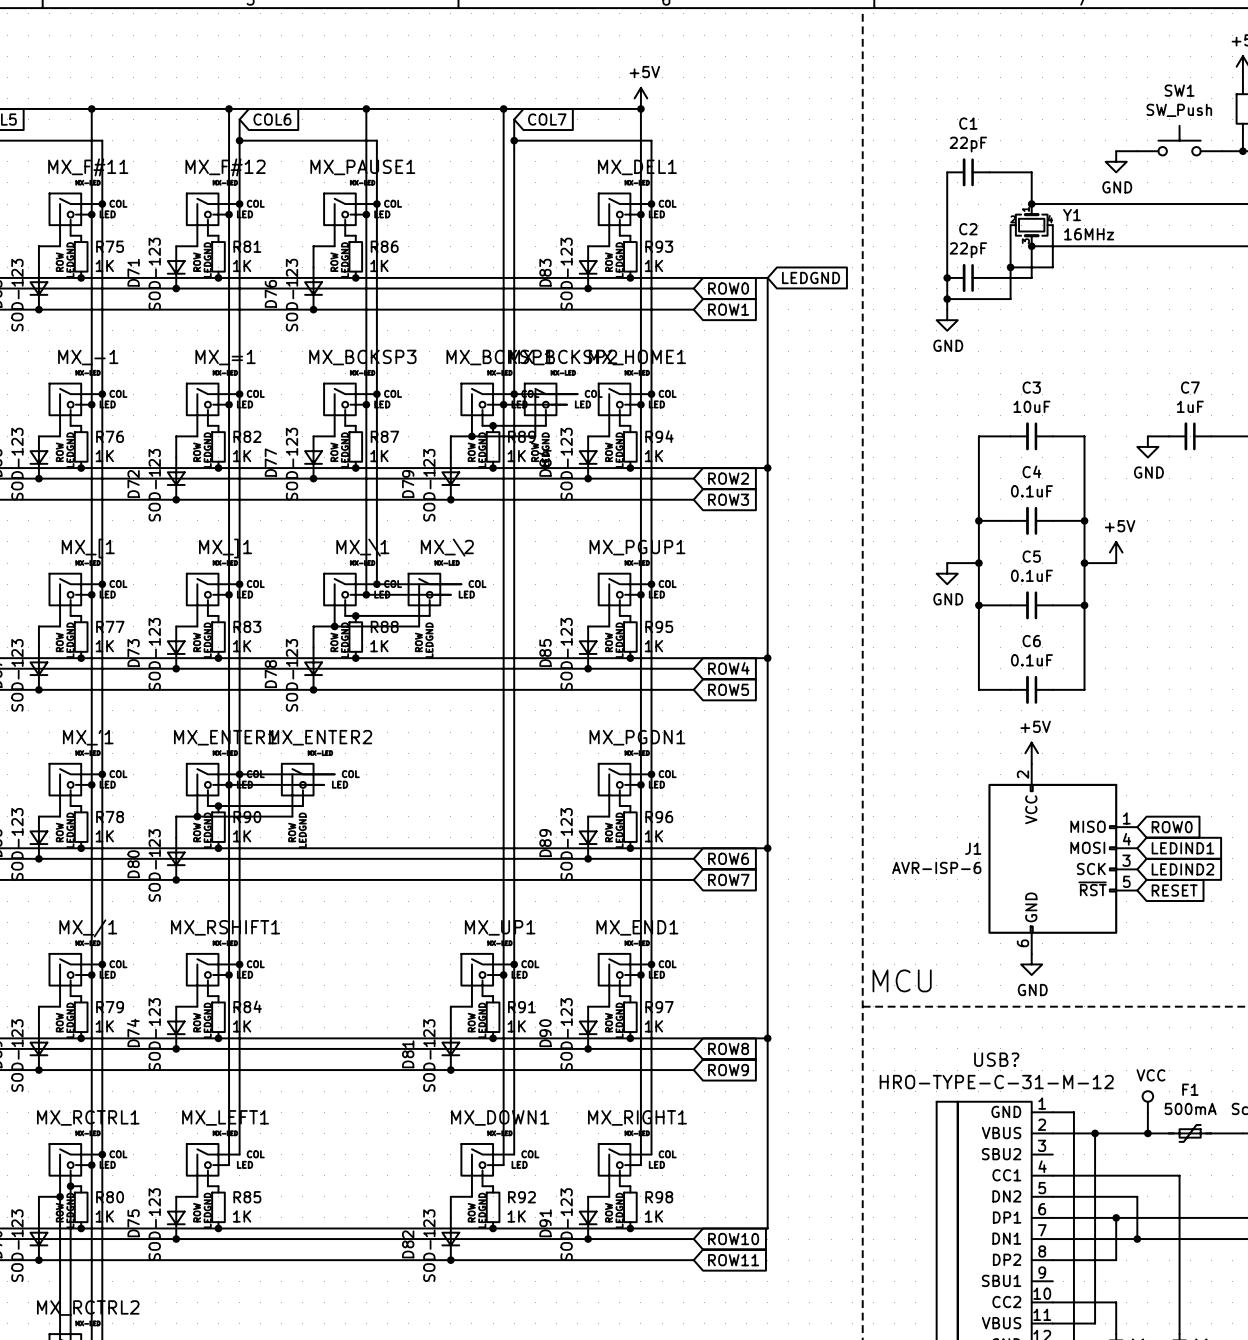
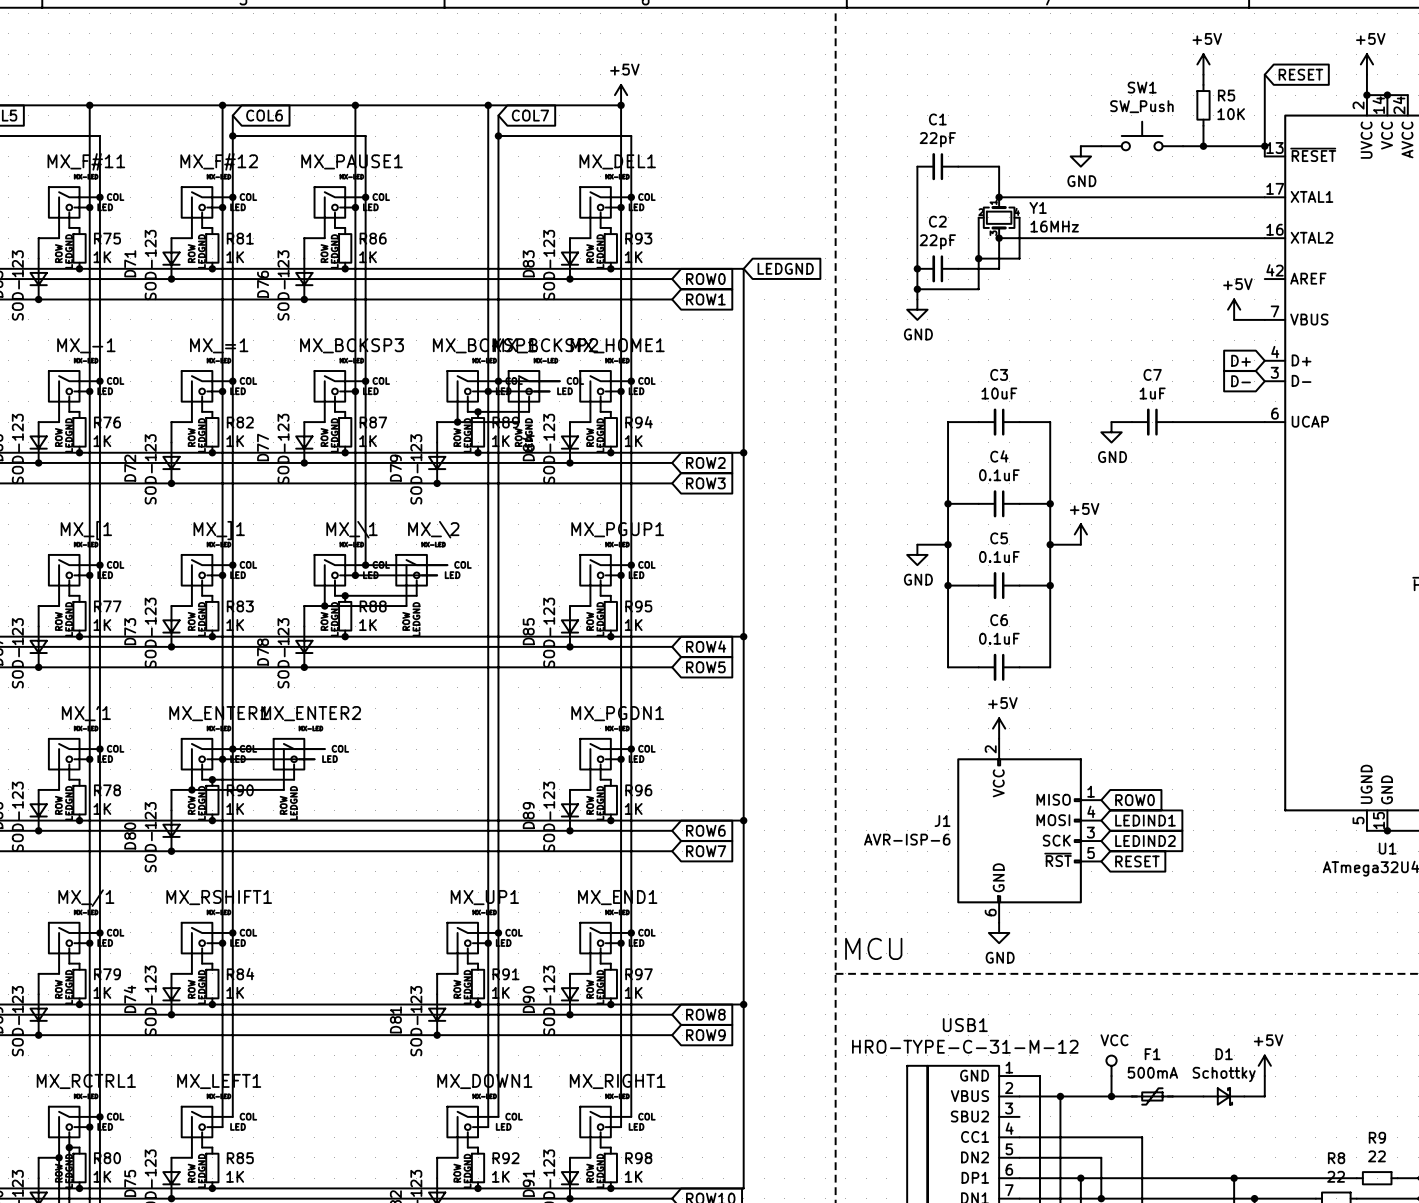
USB? name: USB? (996, 1059) -> USB1 (965, 1025)

